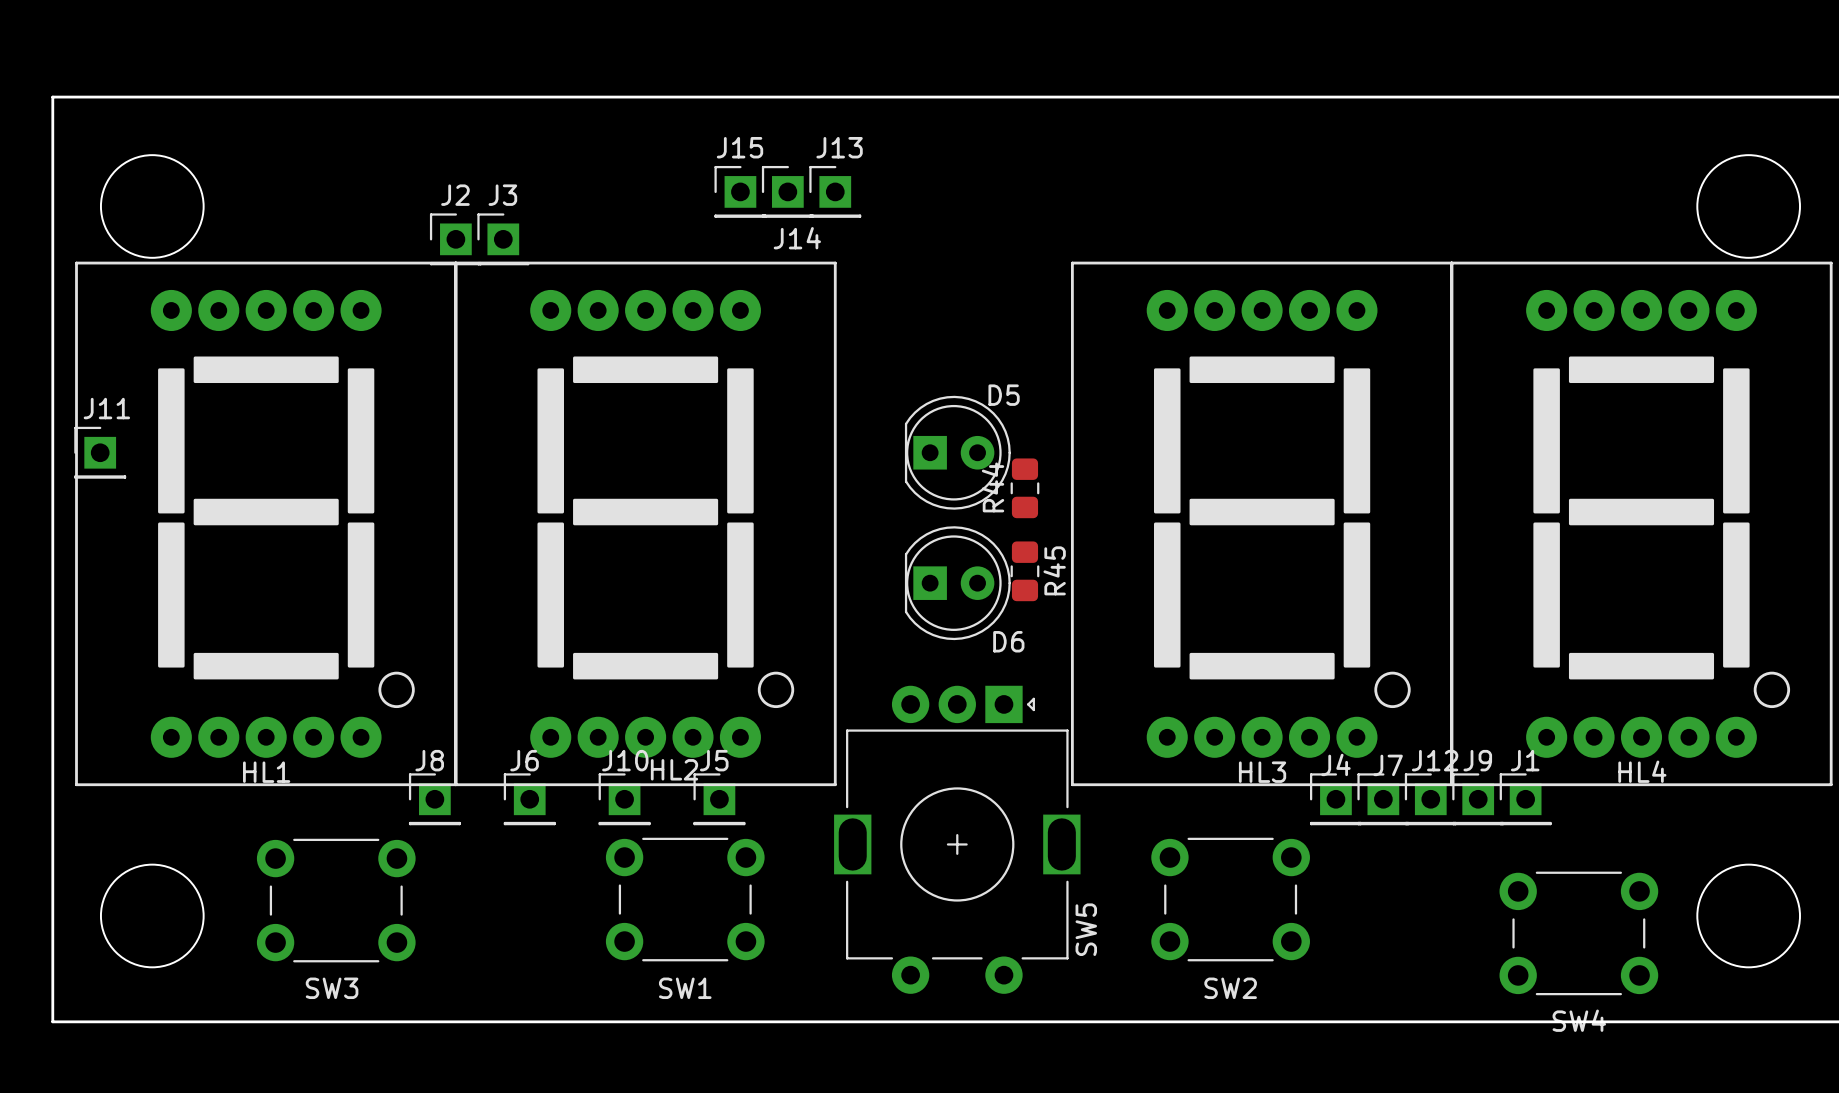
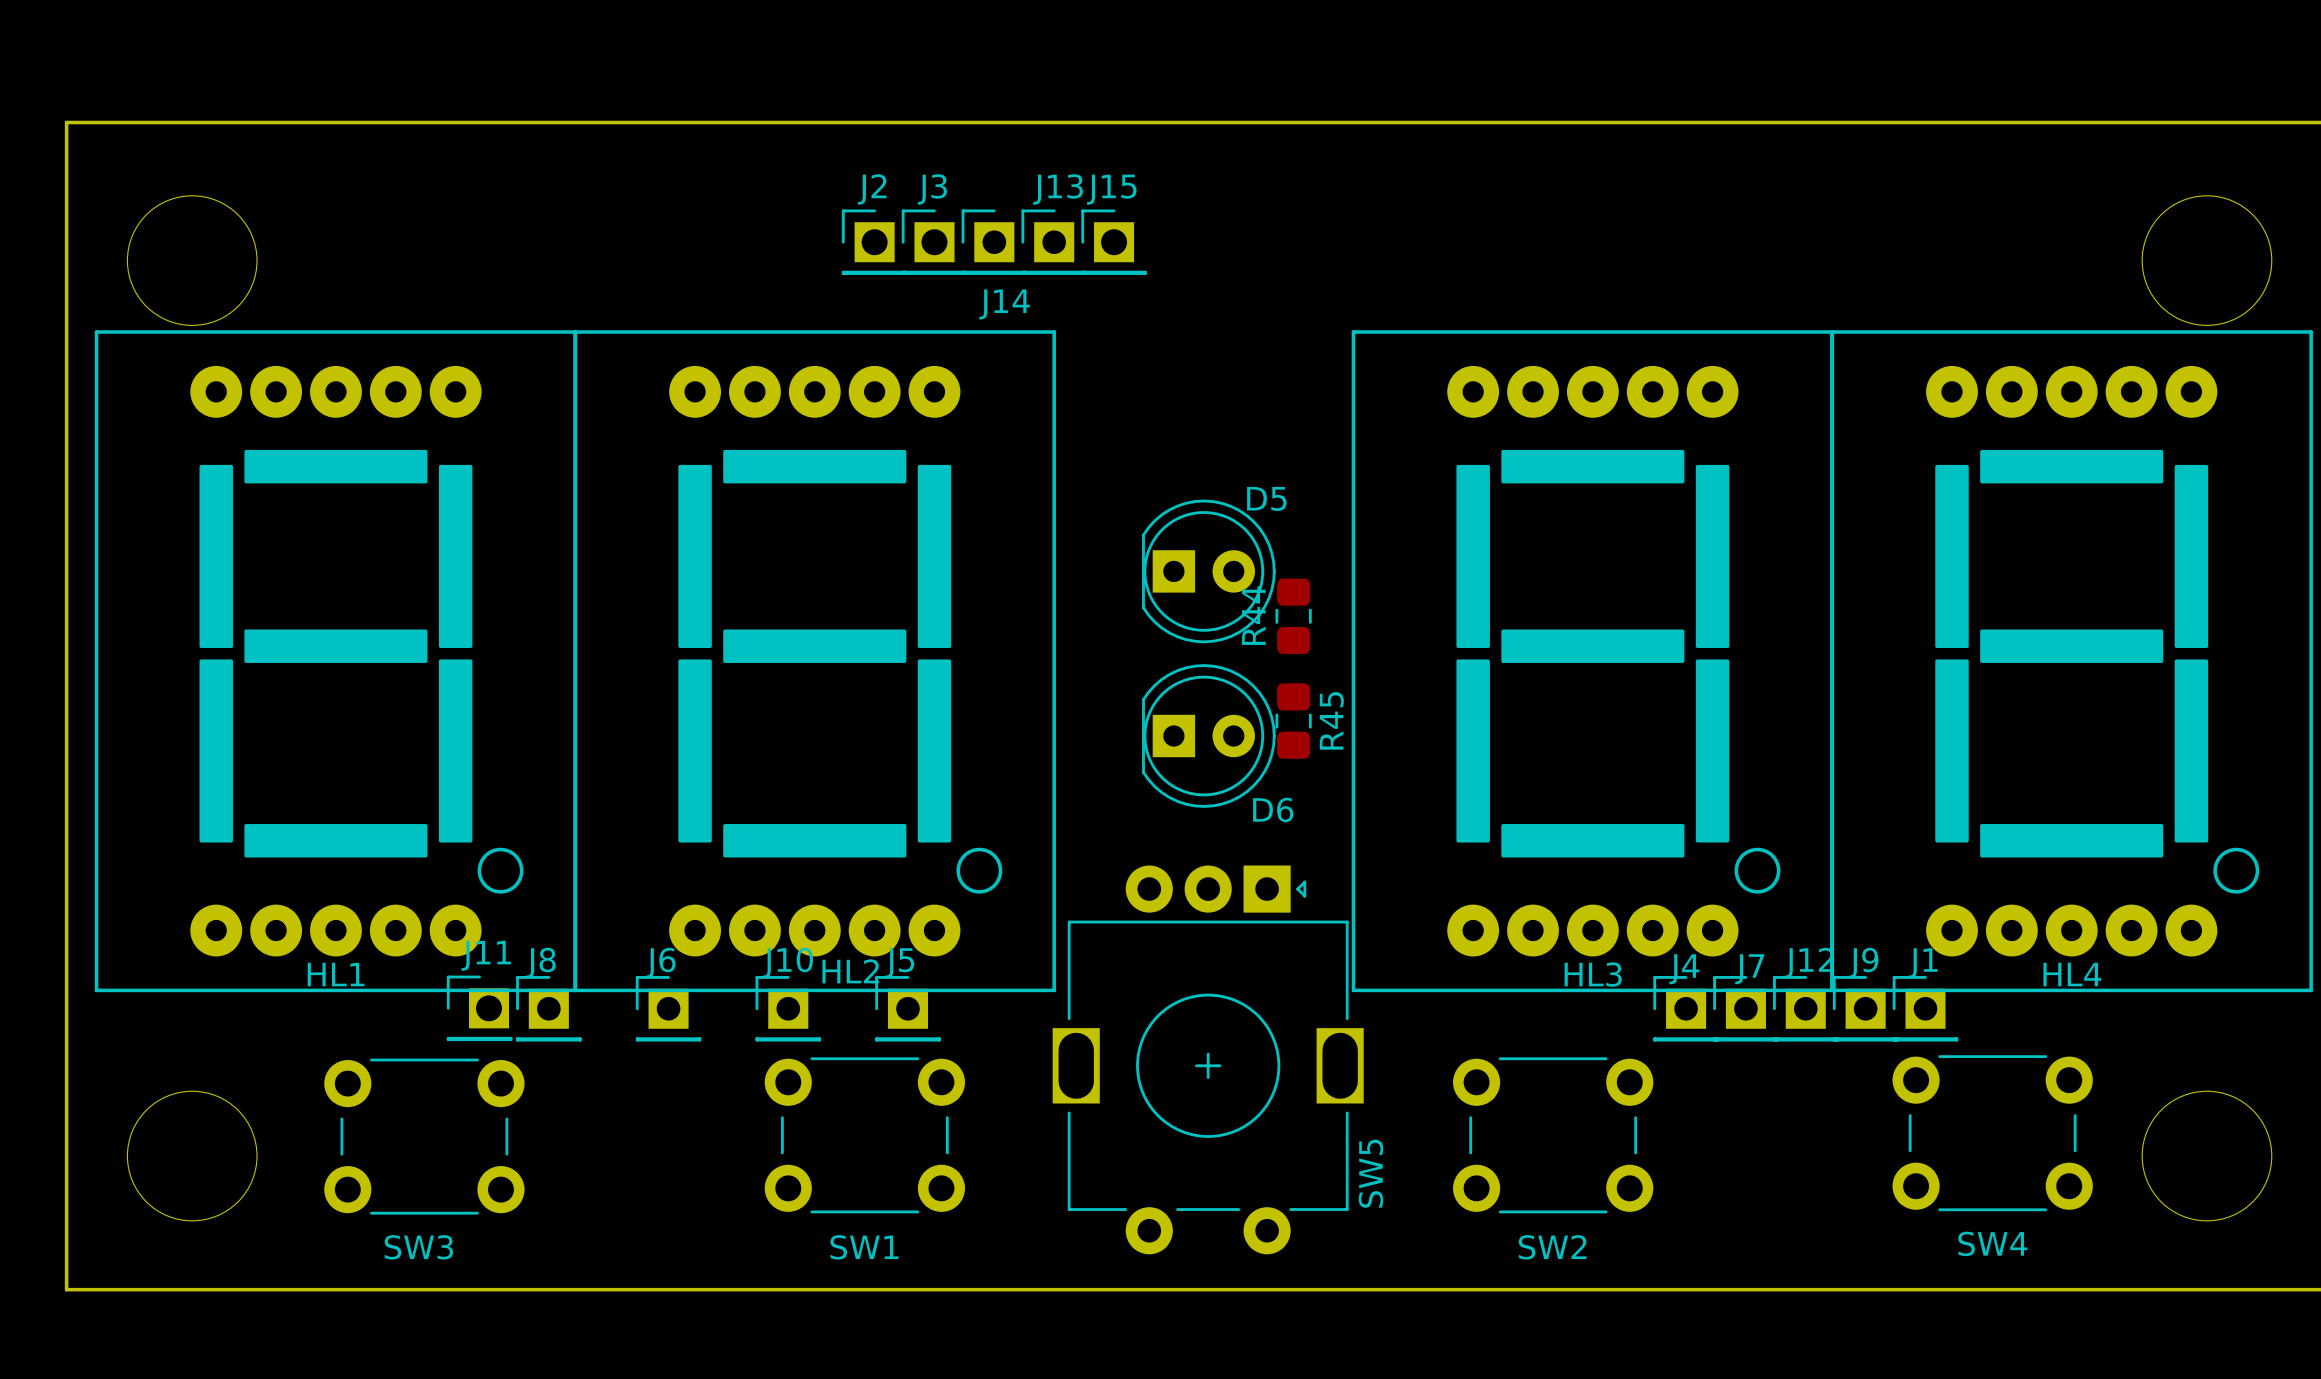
J15 footprint: [714, 165, 767, 218] -> [1081, 209, 1147, 275]
J2 footprint: [429, 213, 482, 266] -> [841, 209, 908, 275]
J3 footprint: [477, 213, 530, 266] -> [901, 209, 968, 275]
J11 footprint: [74, 426, 127, 479] -> [446, 975, 513, 1042]
SW4 position: (1578, 933) -> (1992, 1133)

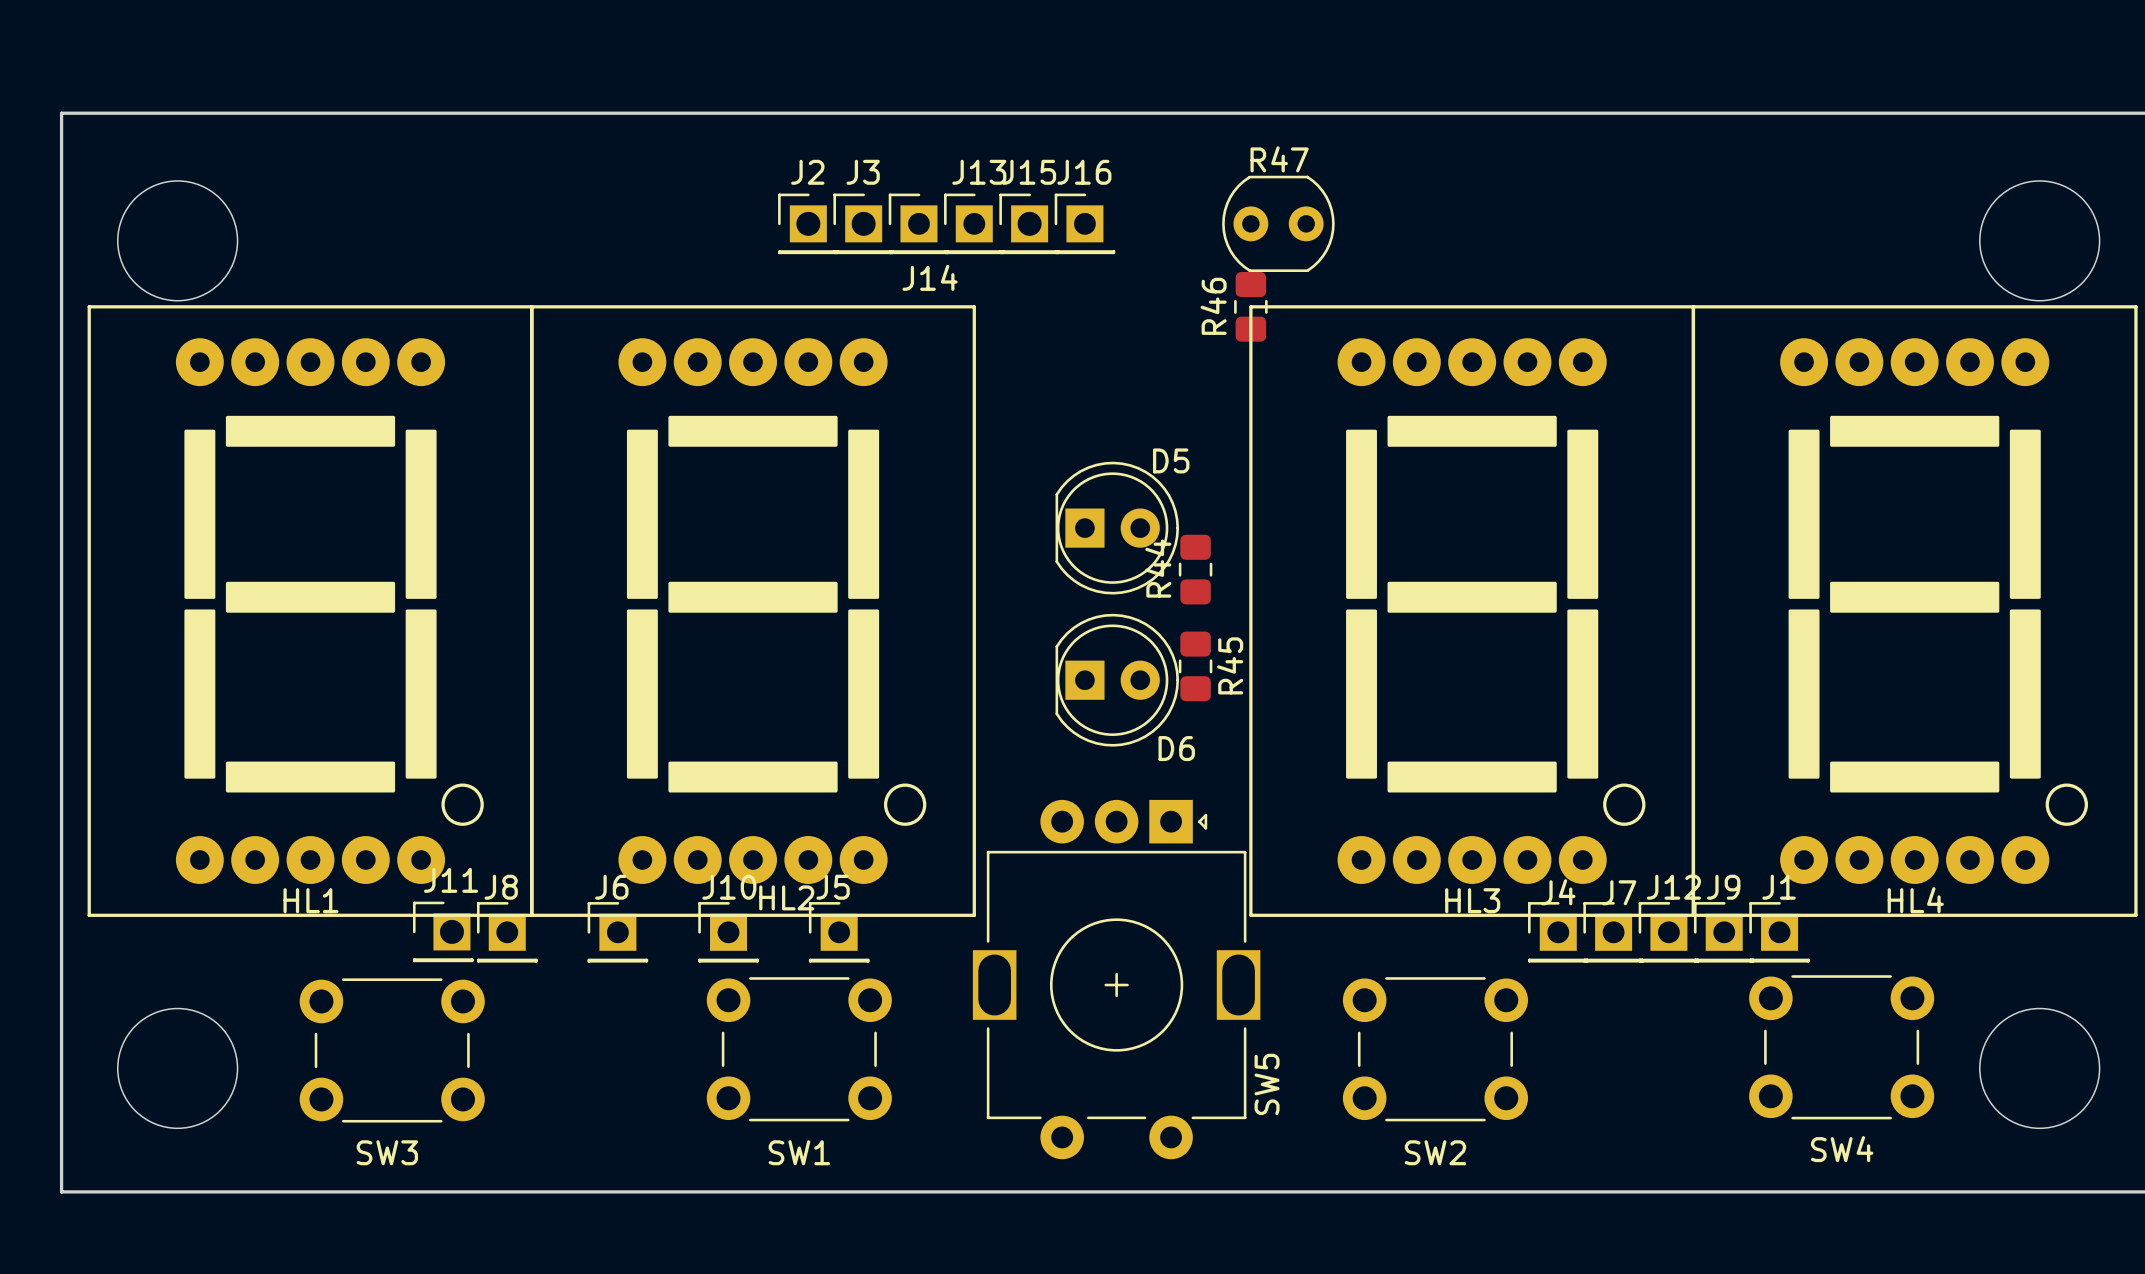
J16: none -> (1084, 223)
R47: none -> (1278, 223)
R46: none -> (1250, 306)

